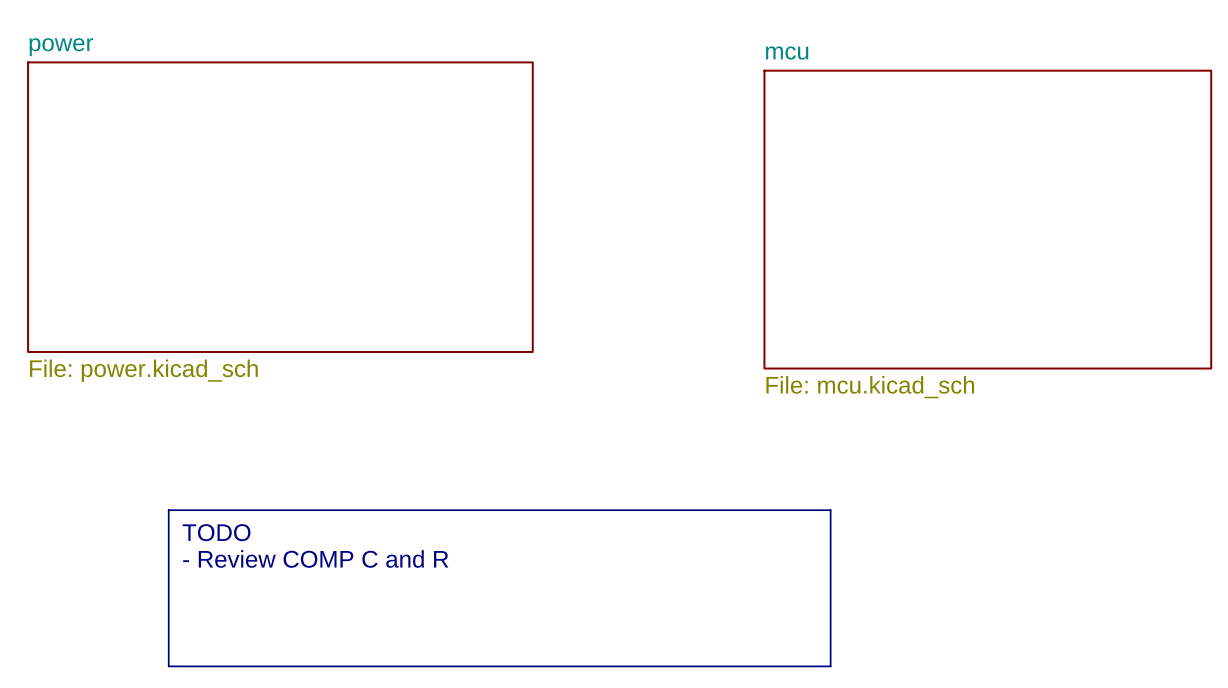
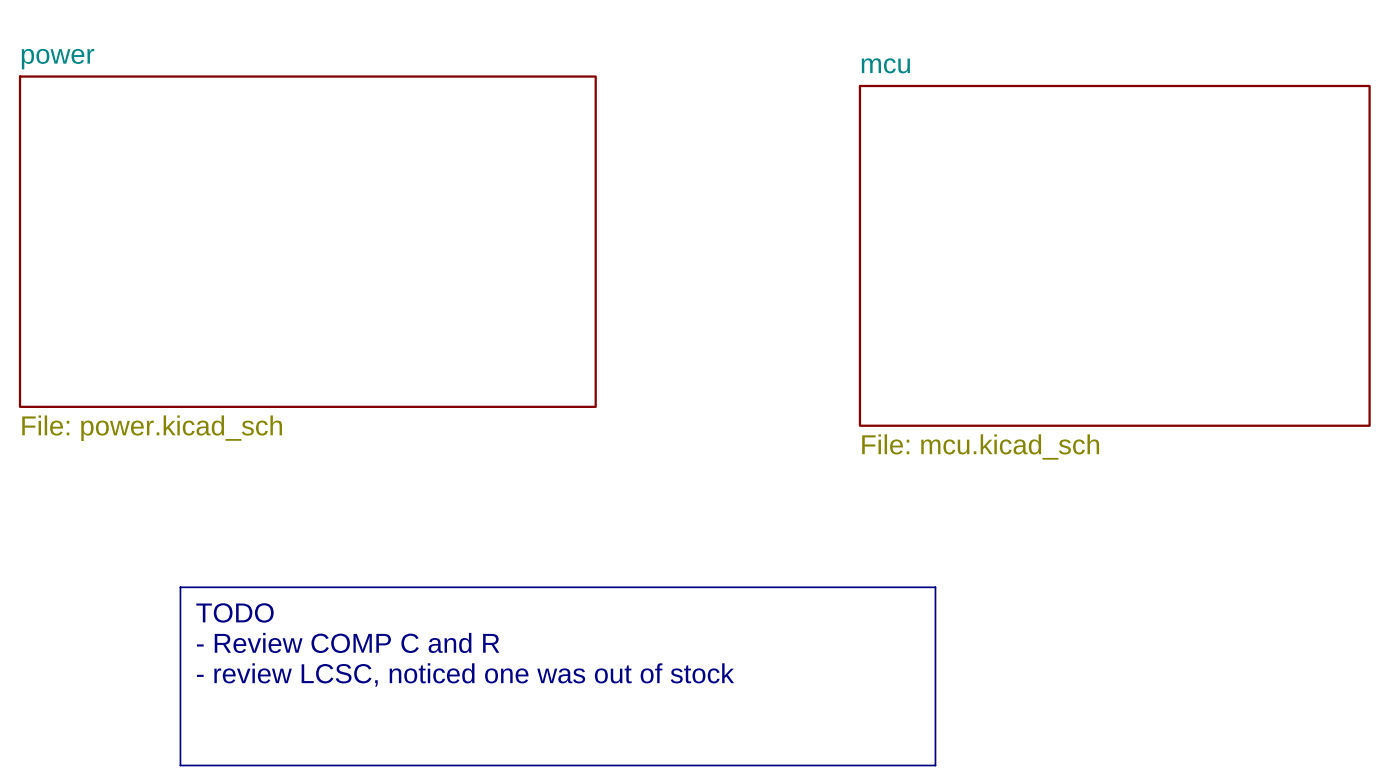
text: none -> - review LCSC, noticed one was out of stock (465, 674)

